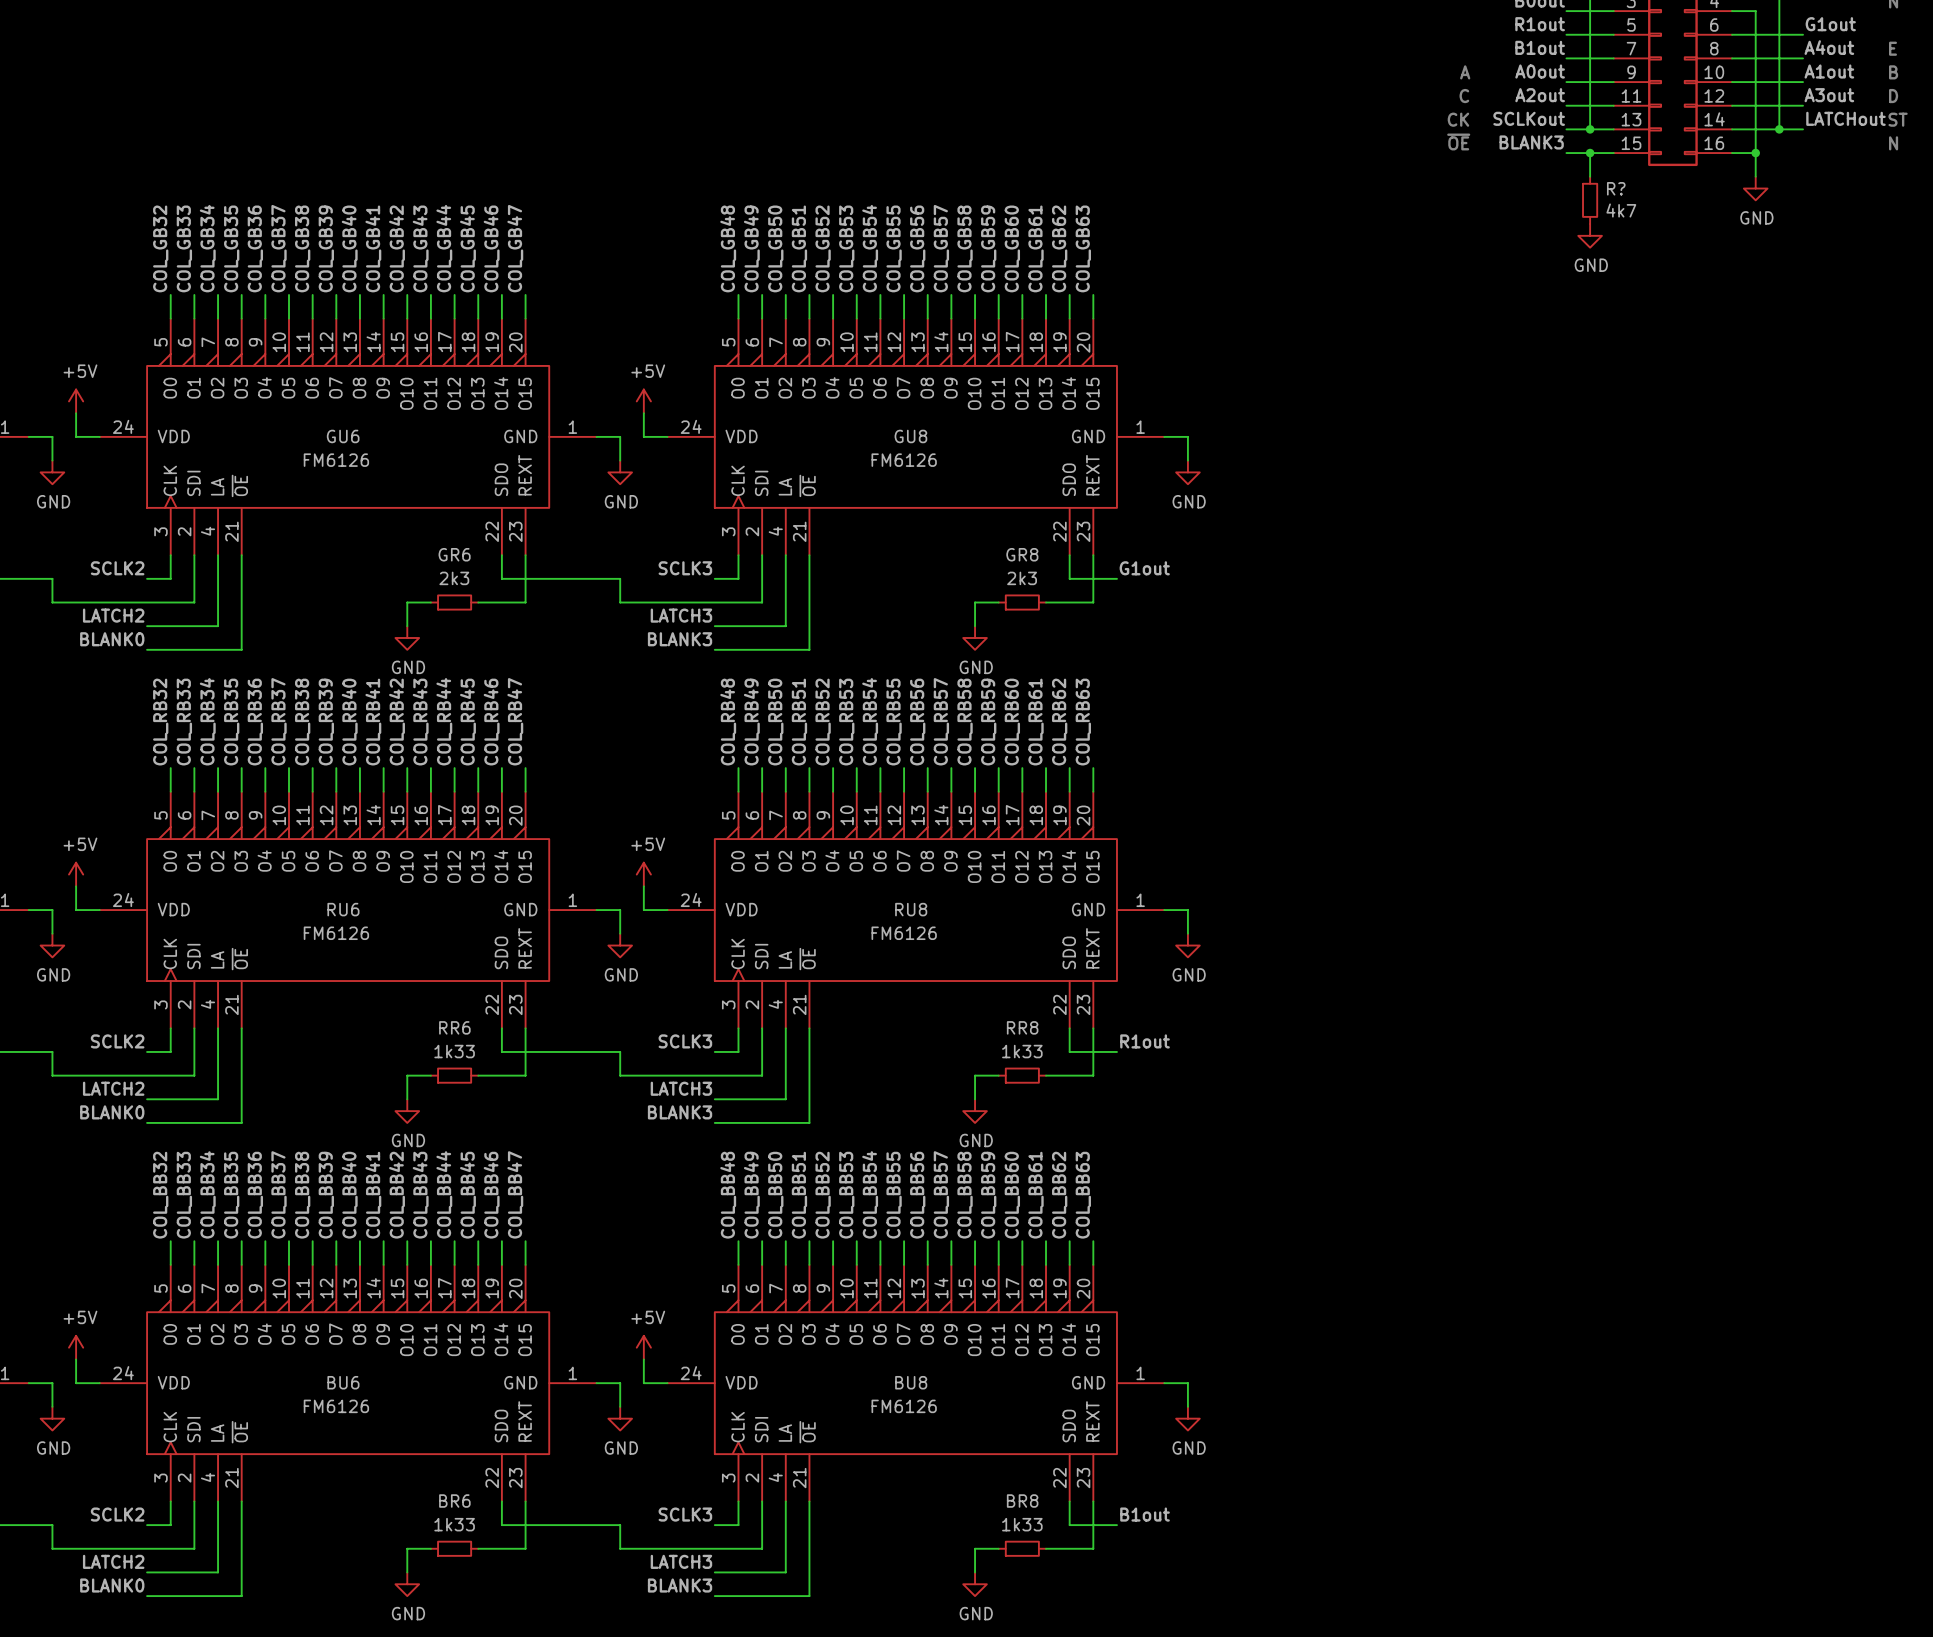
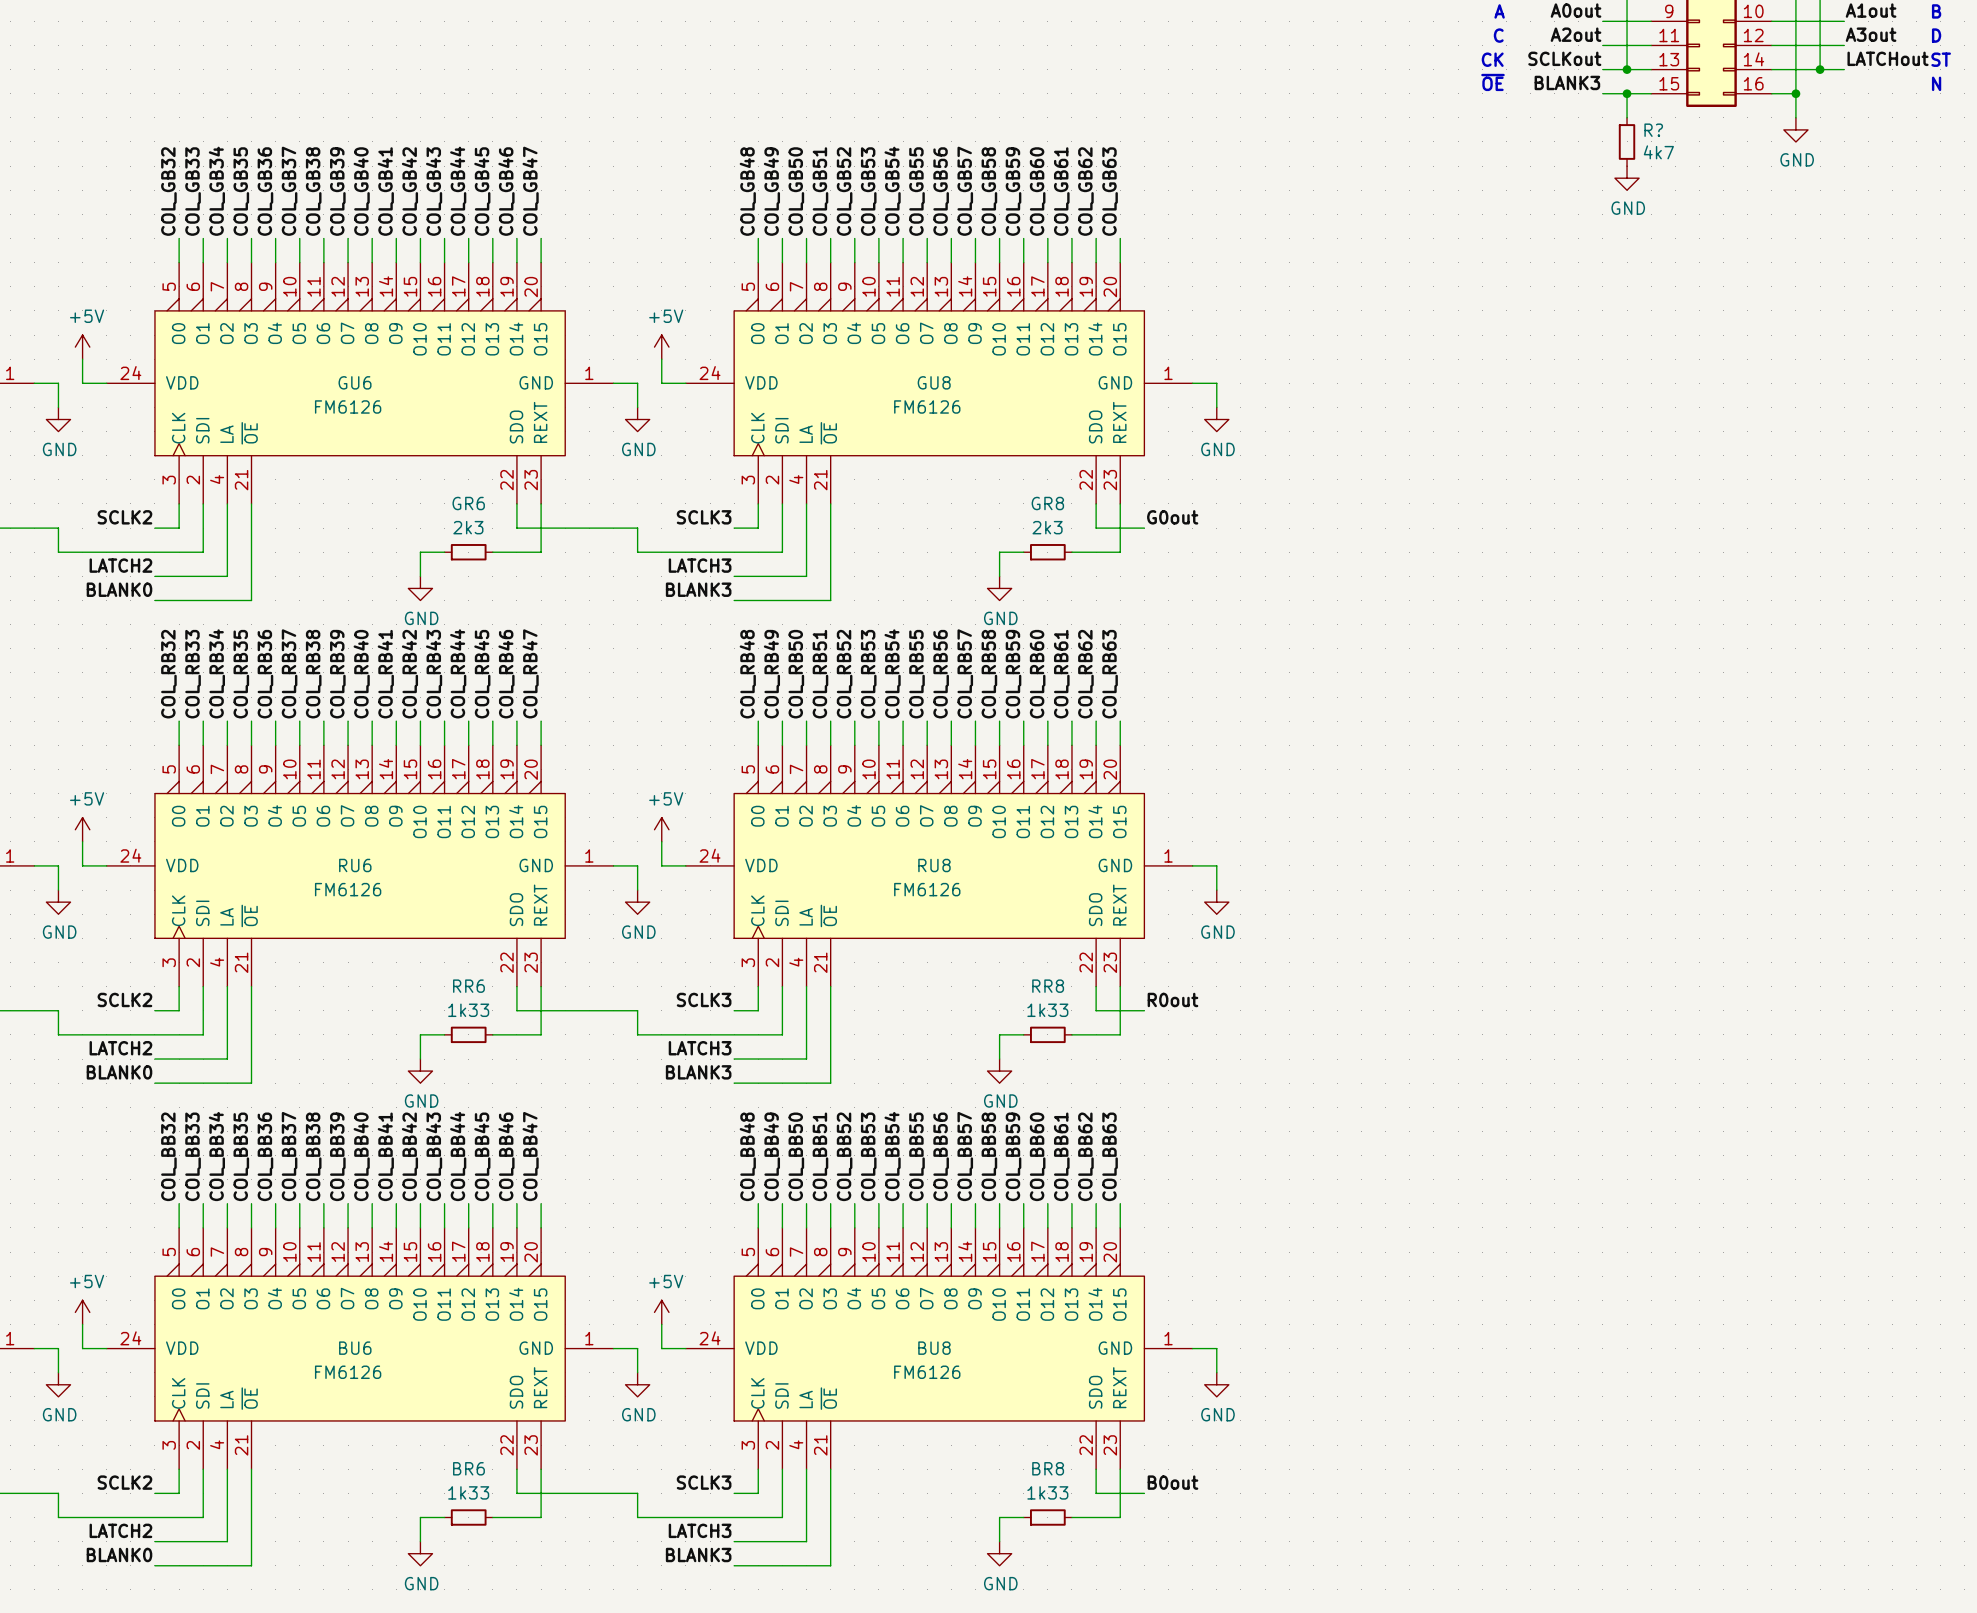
label: G1out (1144, 568) -> G0out (1172, 517)
label: R1out (1145, 1041) -> R0out (1172, 999)
label: B1out (1145, 1514) -> B0out (1172, 1482)

